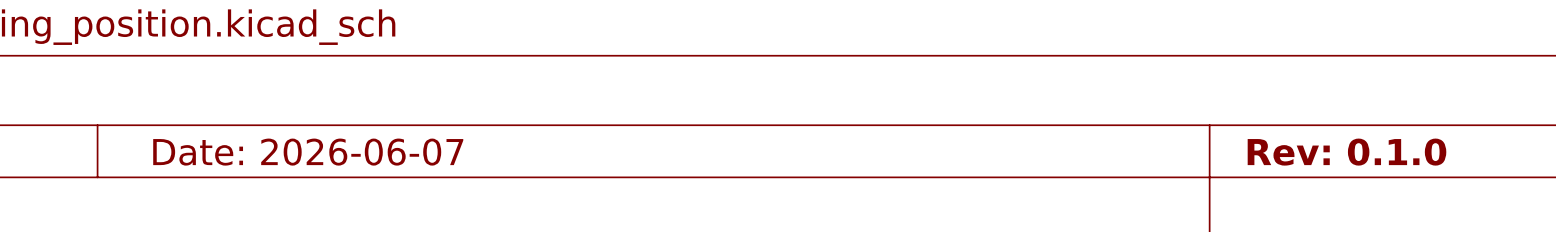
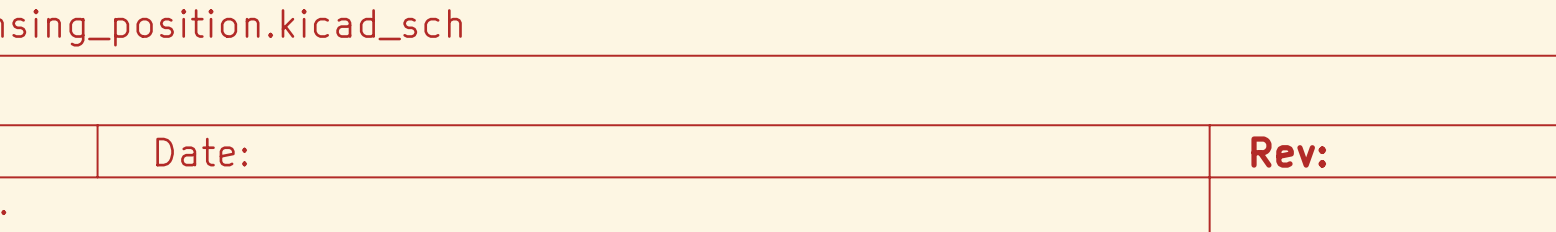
title block: Date: 2026-06-07 (308, 152) -> Date: (201, 152)
title block: Rev: 0.1.0 (1346, 152) -> Rev: (1288, 152)

